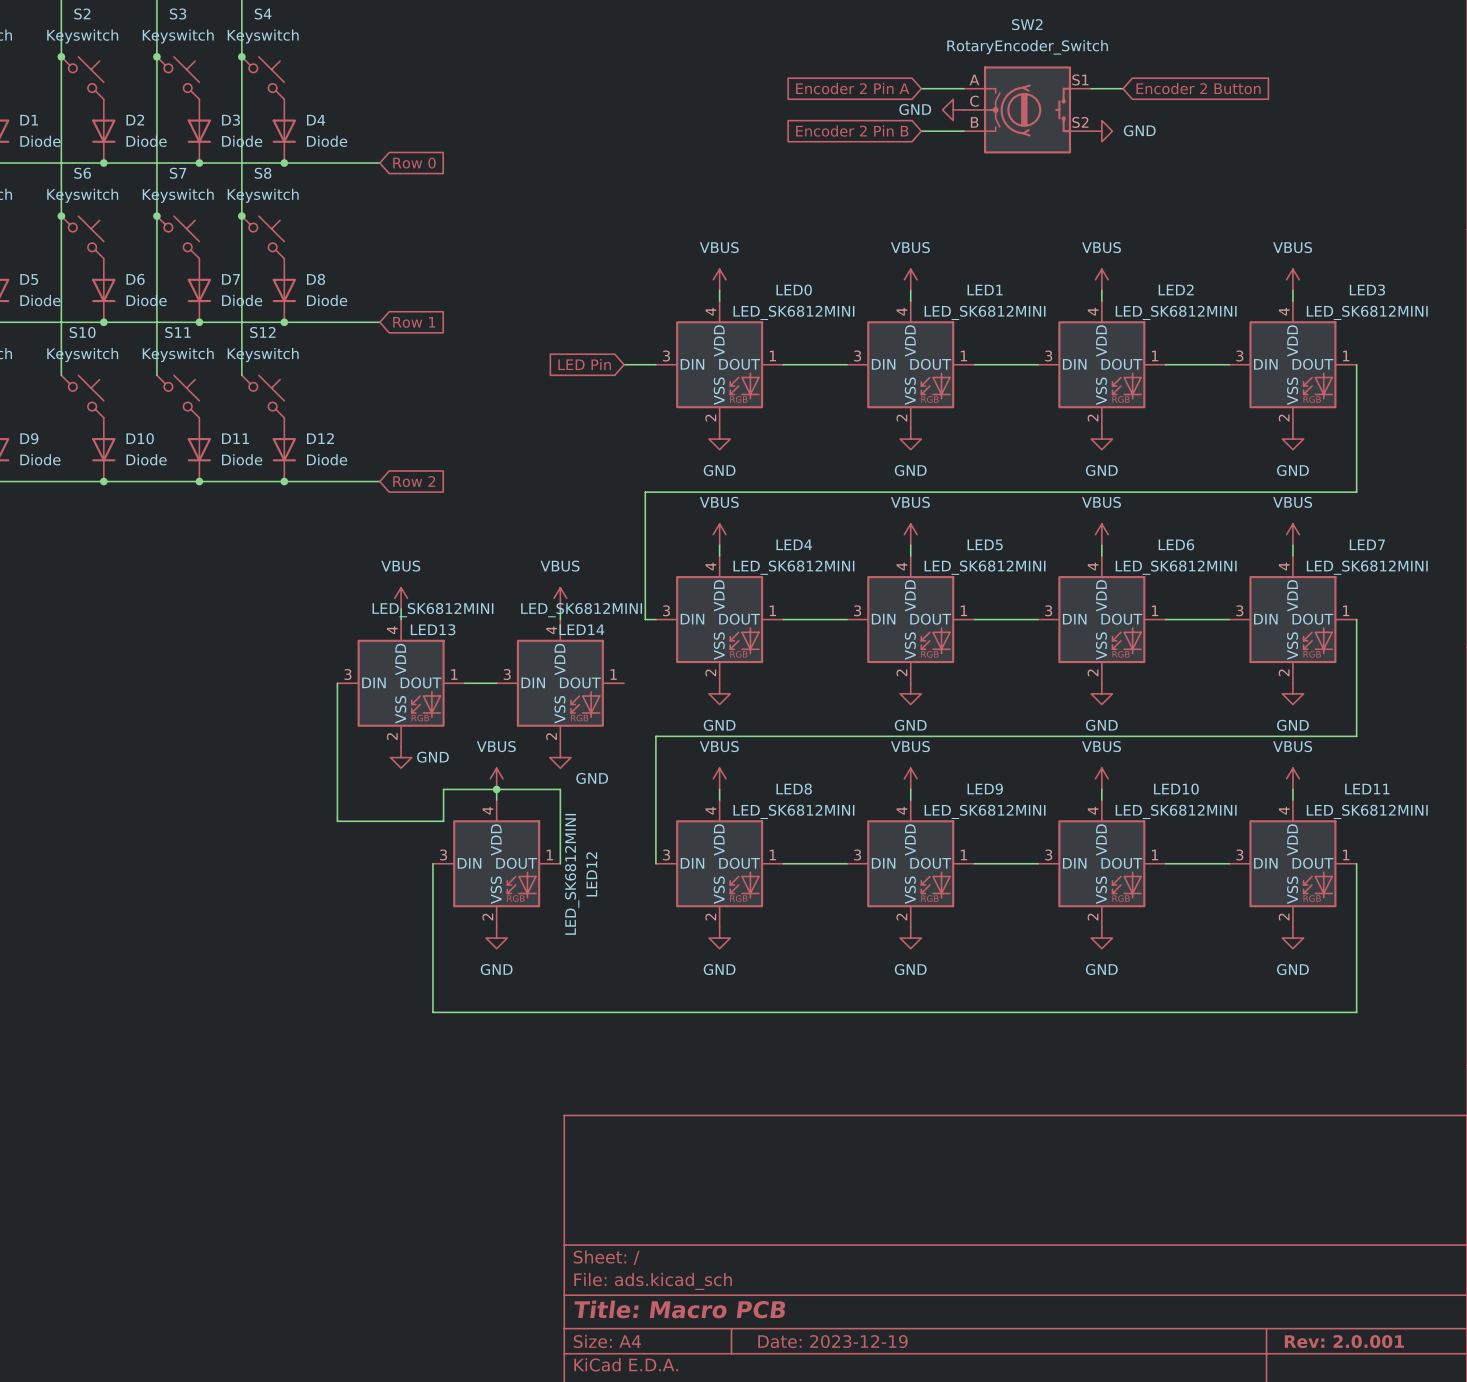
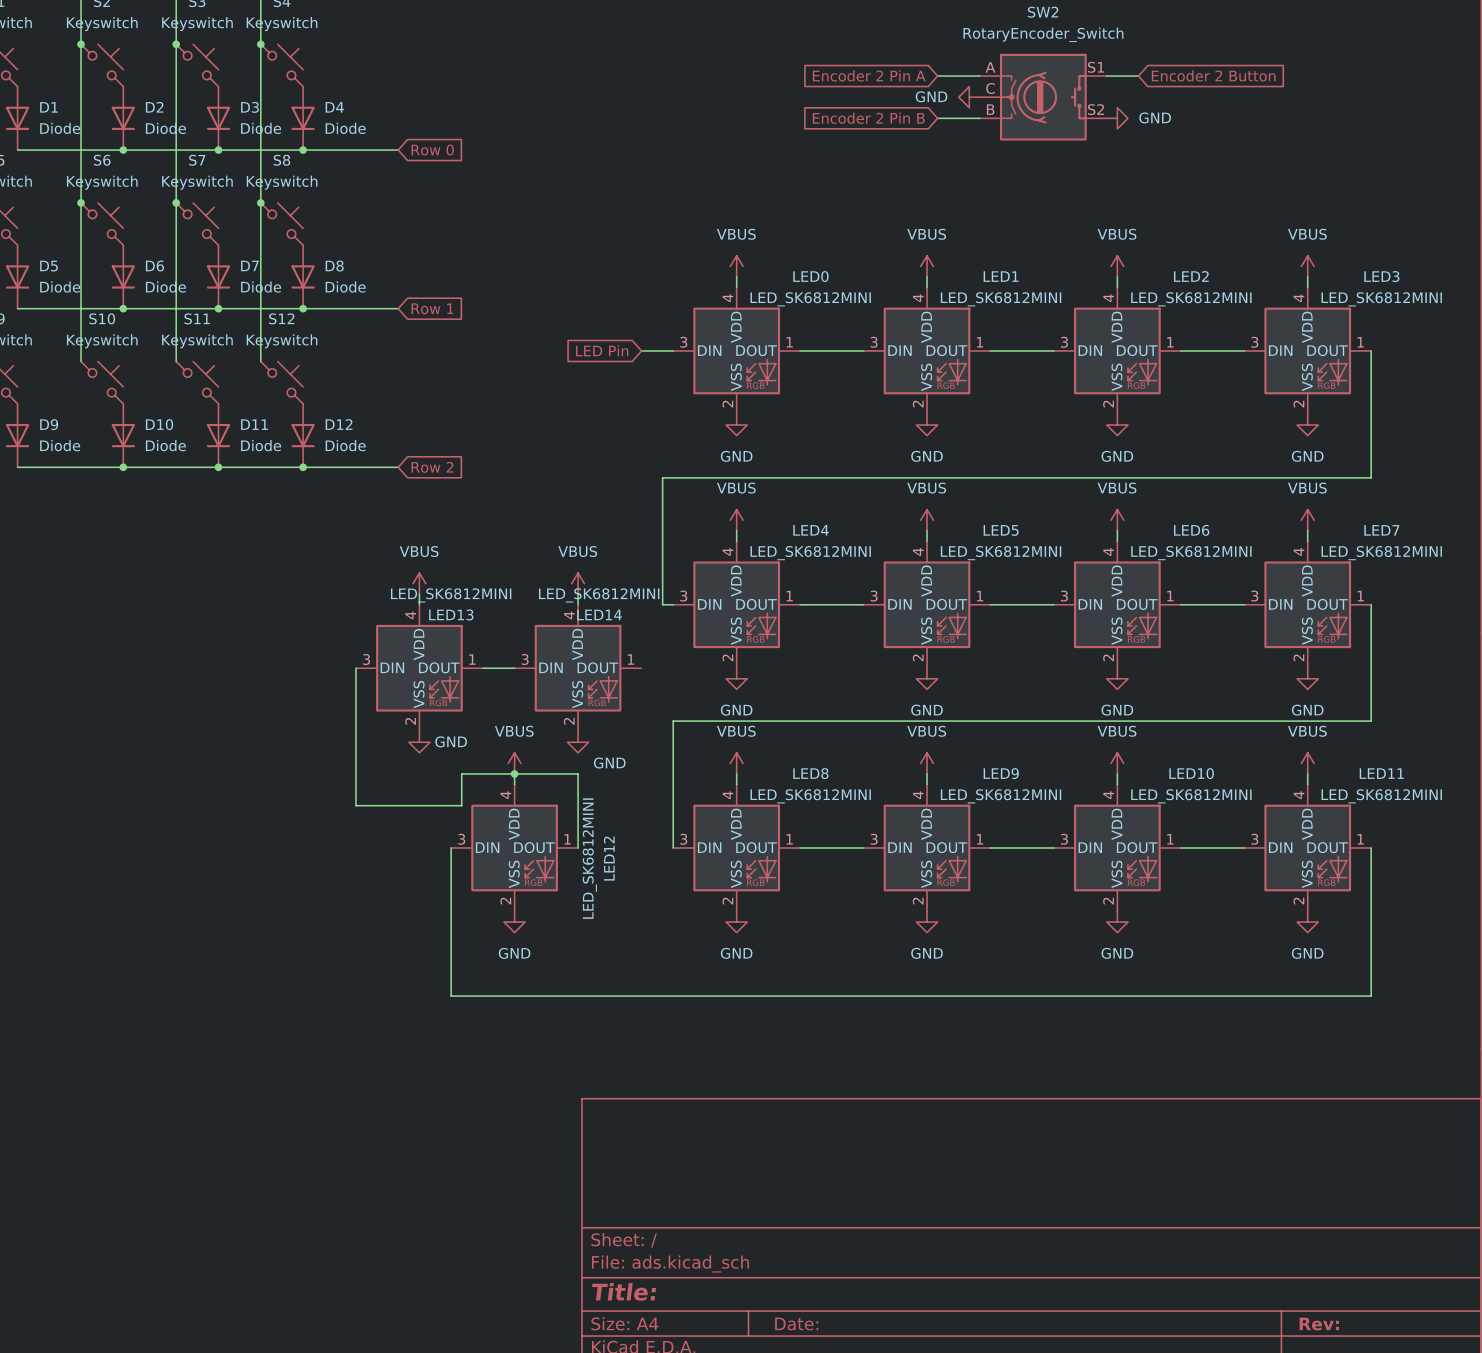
title block: Title: Macro PCB (679, 1309) -> Title: (624, 1291)
title block: Date: 2023-12-19 (832, 1341) -> Date: (796, 1324)
title block: Rev: 2.0.001 (1344, 1341) -> Rev: (1319, 1324)

